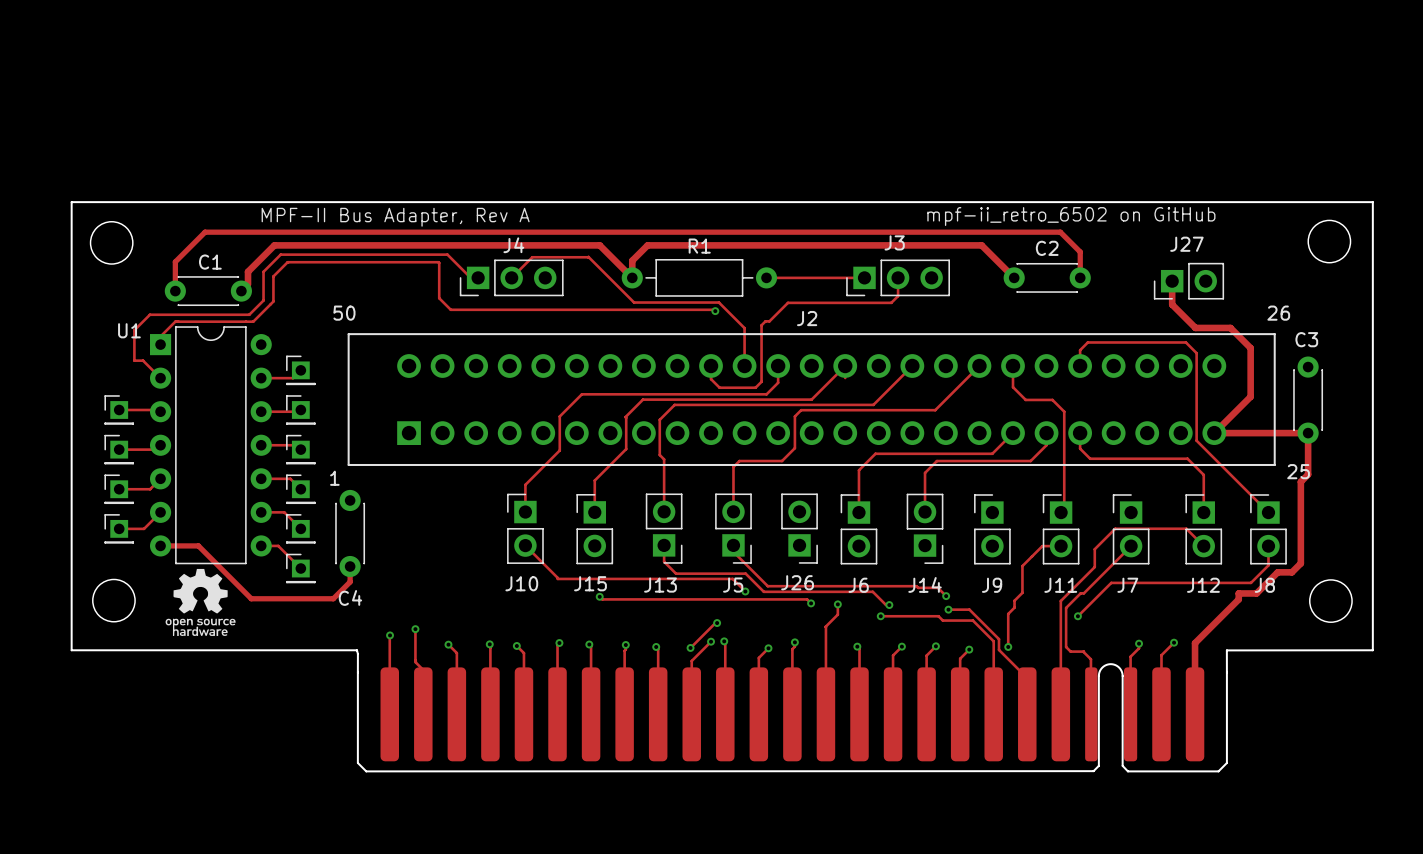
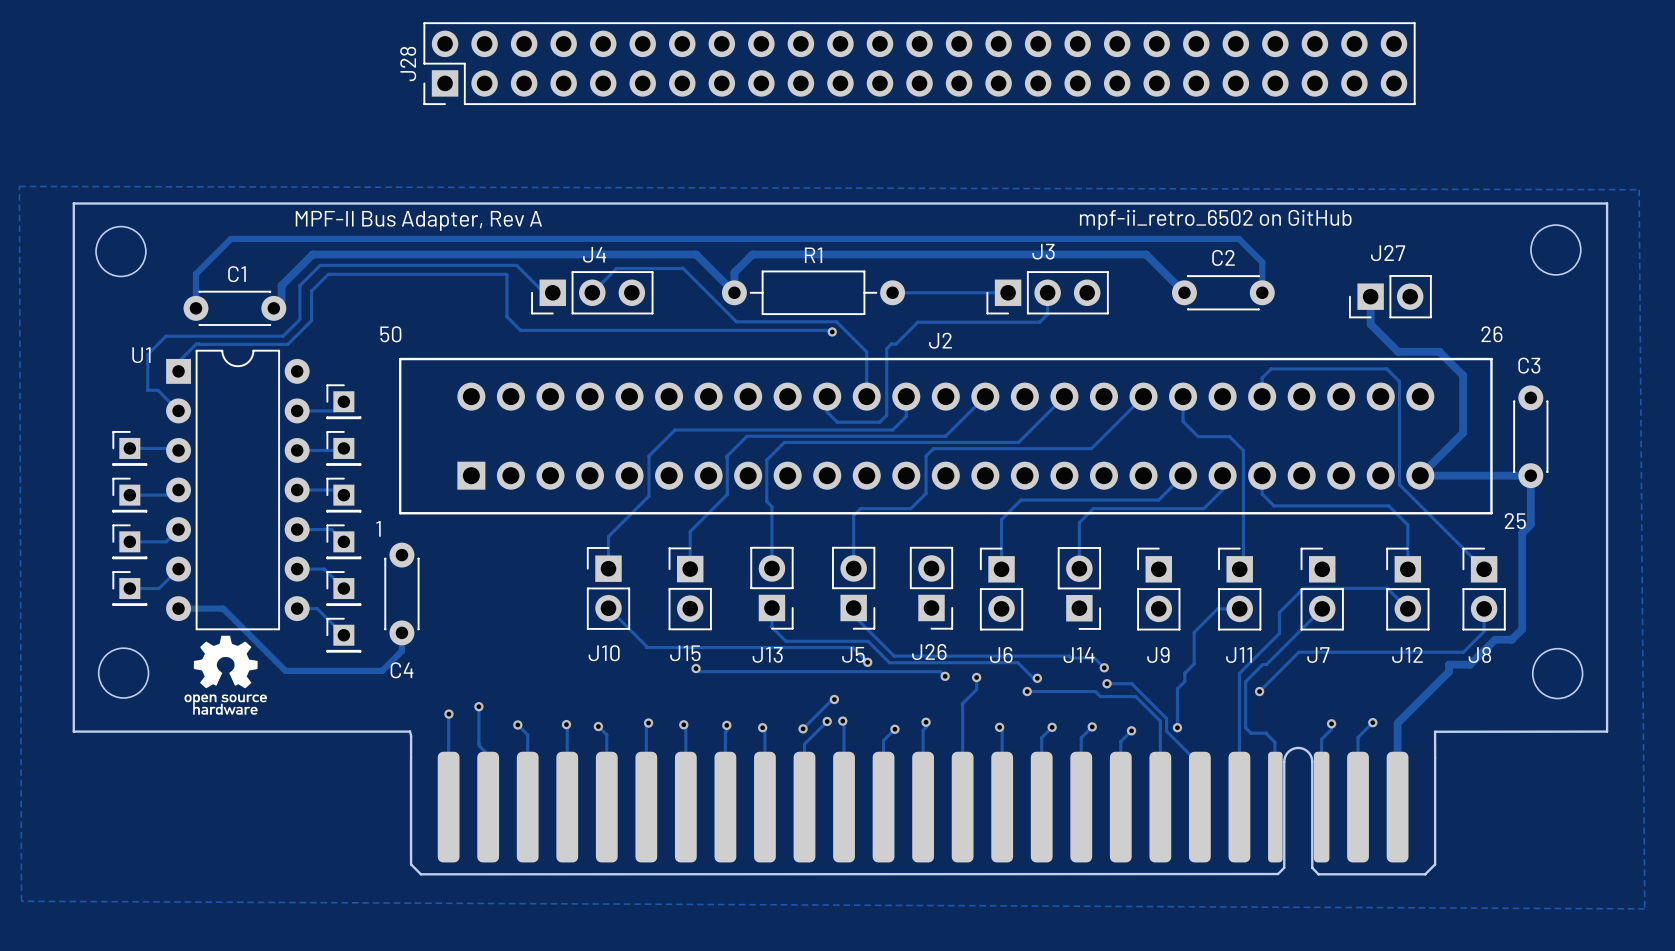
J28: none -> (919, 63)
zone outline: none -> (19, 186) (21, 901) (1644, 908) (1639, 189) (19, 186)

